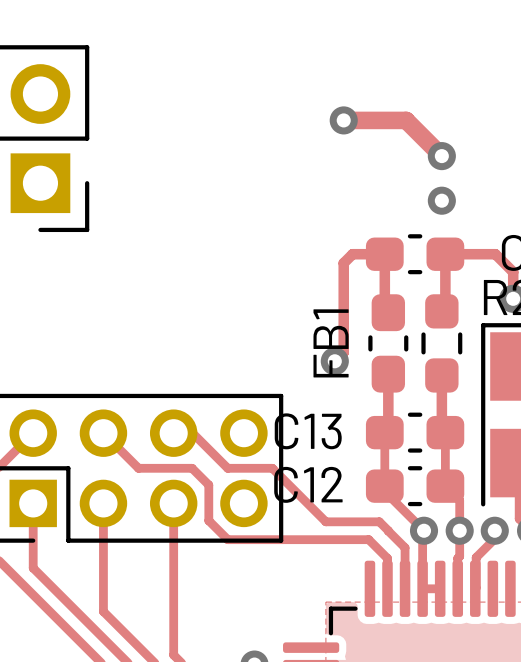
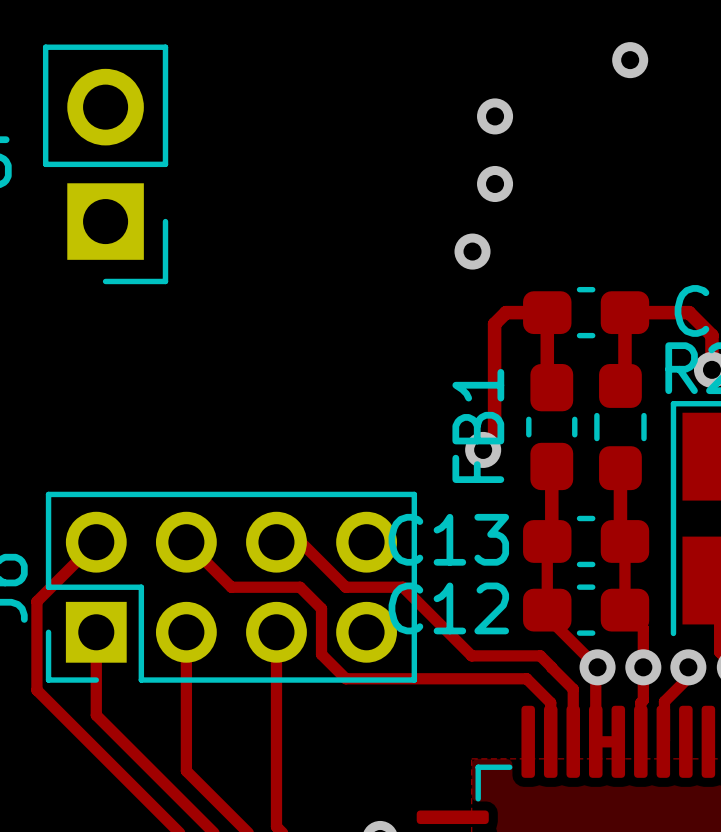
via: none -> (630, 60)
track: (343, 120) (406, 120) (441, 156) -> none
via position: (343, 120) -> (495, 116)
via: none -> (495, 183)
via: (441, 156) -> none
via: (441, 200) -> none
via: none -> (472, 251)

